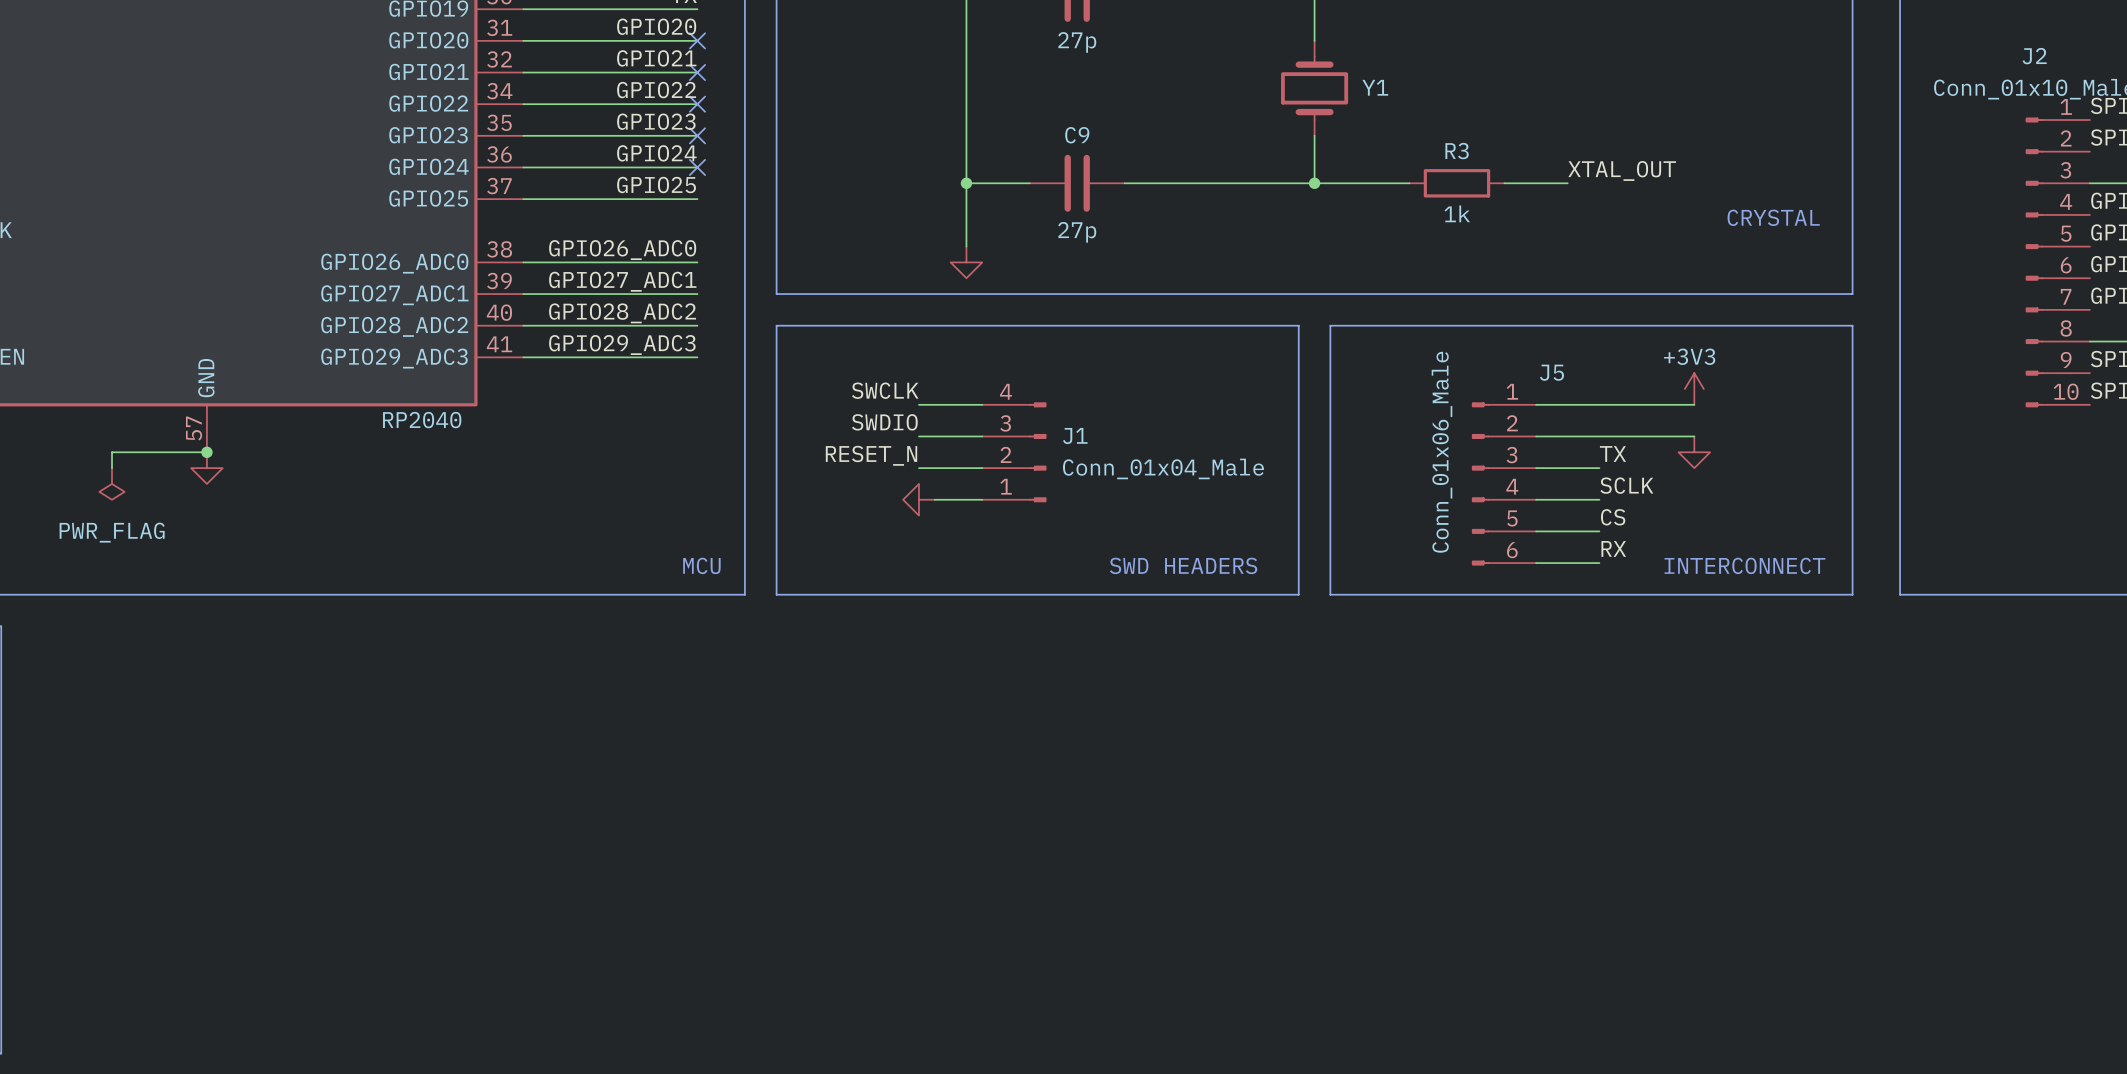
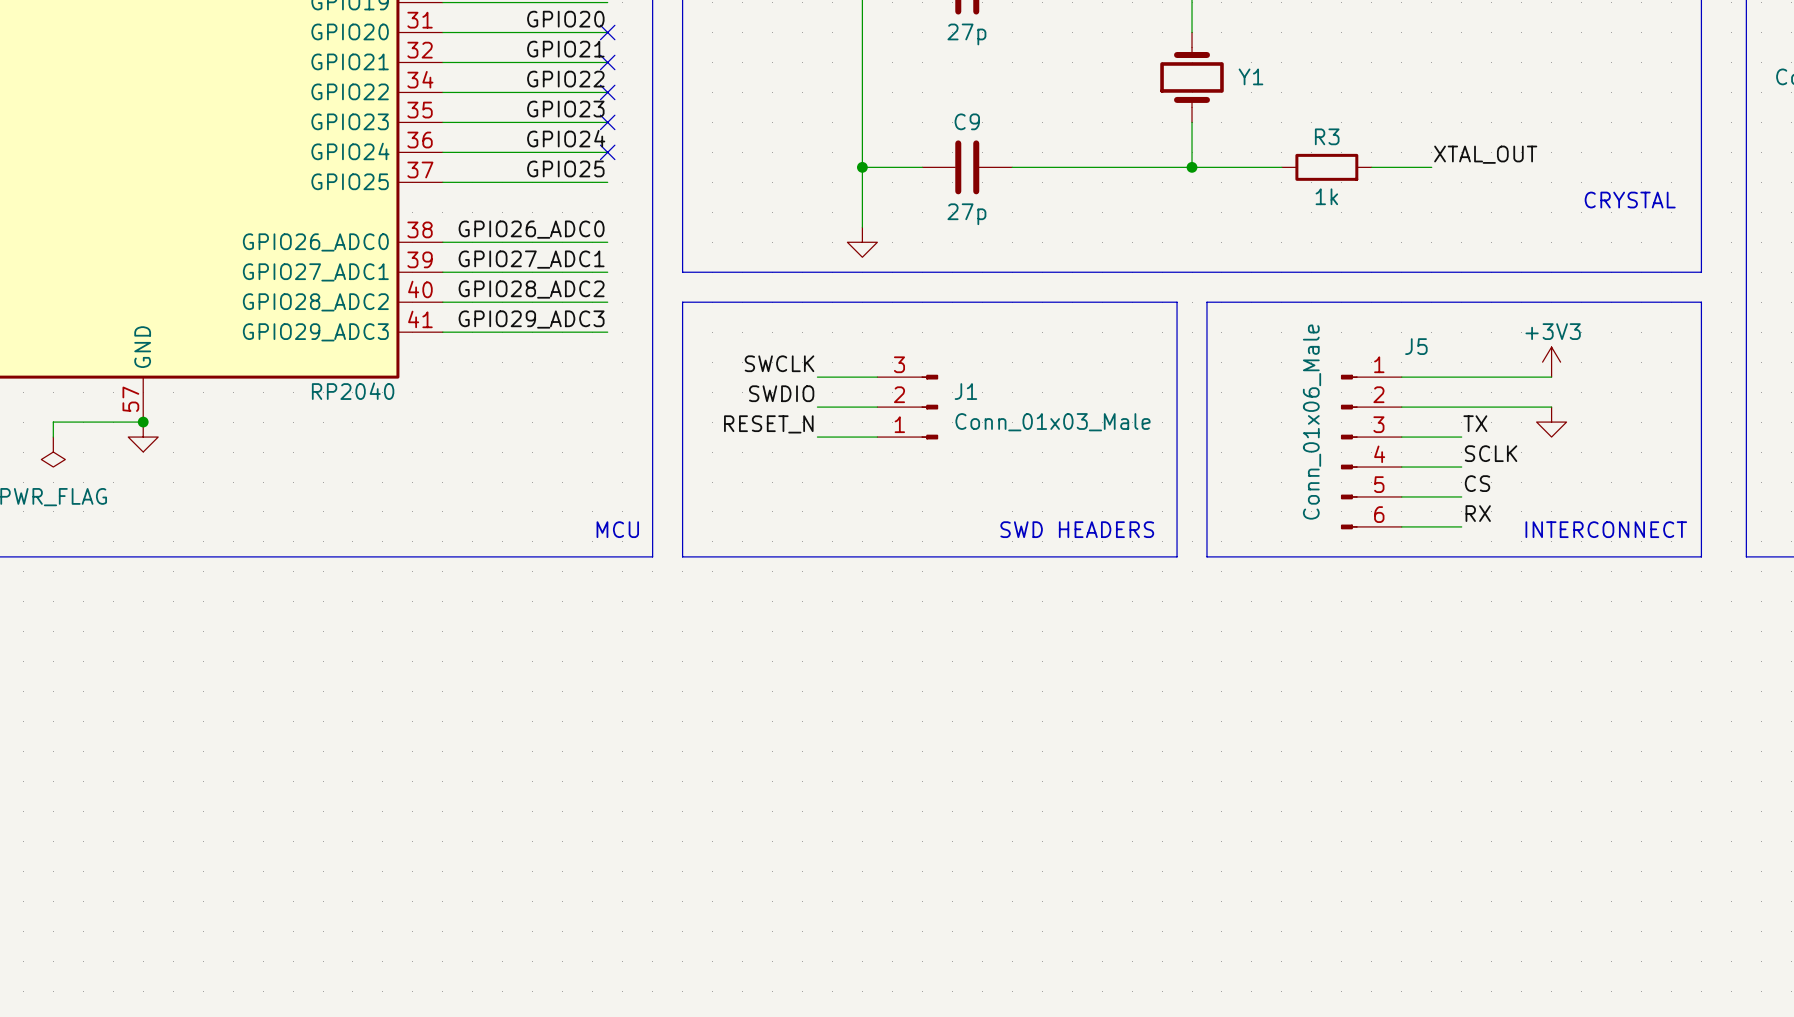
J1 symbol: [982, 402, 1047, 503] -> [877, 374, 939, 440]
J1 value: Conn_01x04_Male (1163, 468) -> Conn_01x03_Male (1052, 422)
power symbol: (918, 499) -> none
wire: (934, 499) (982, 499) -> none

